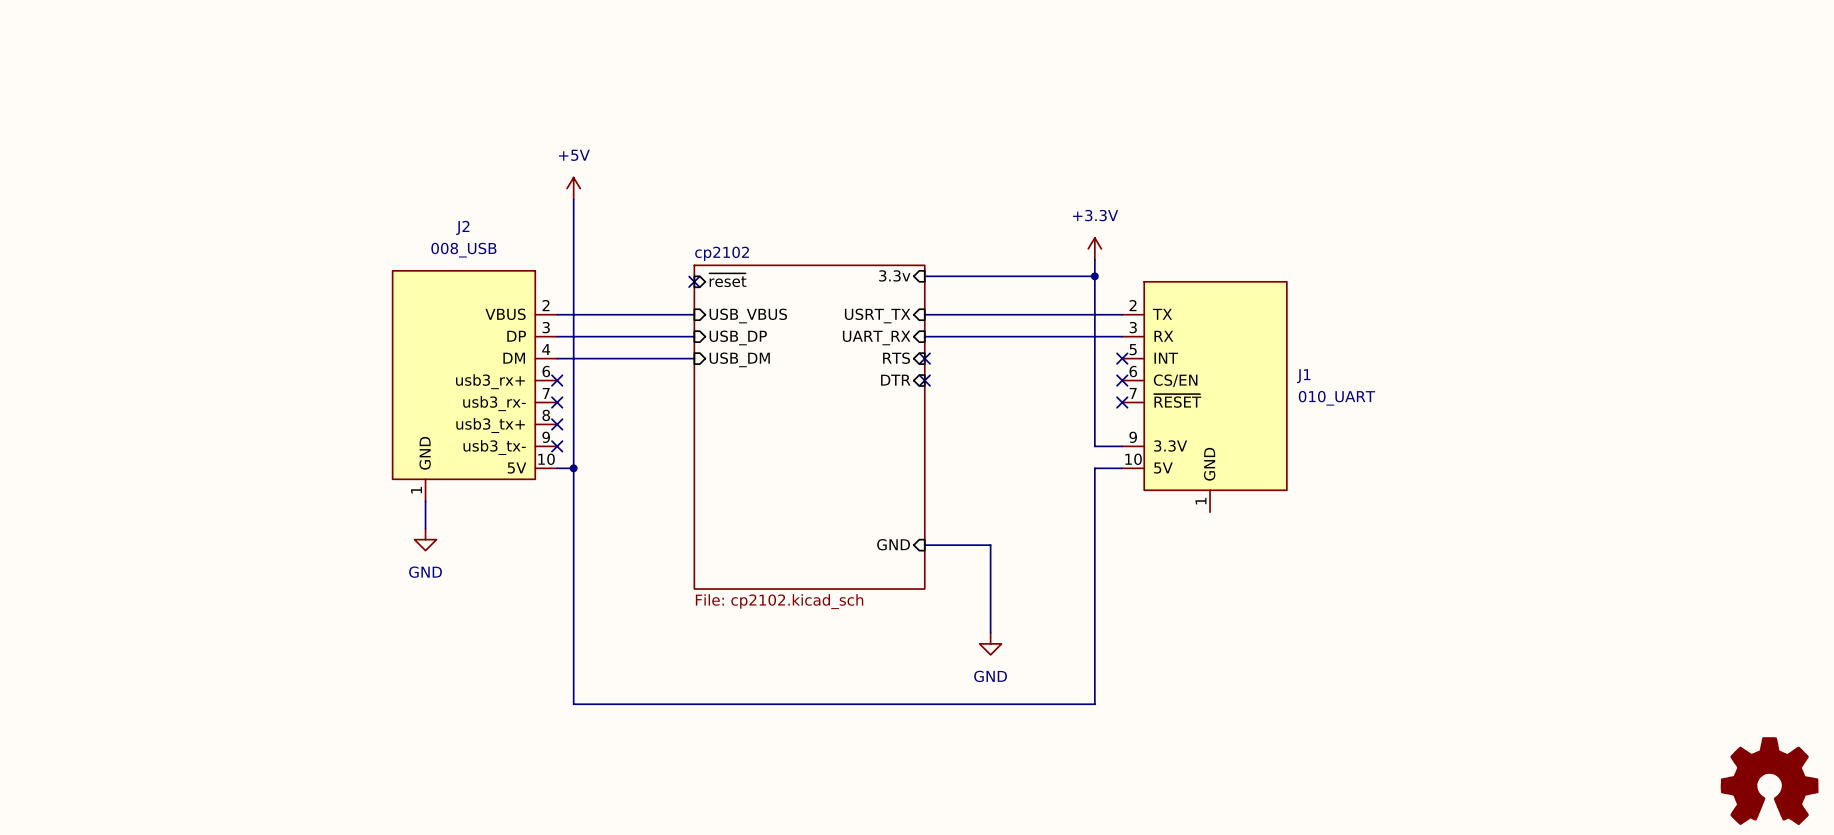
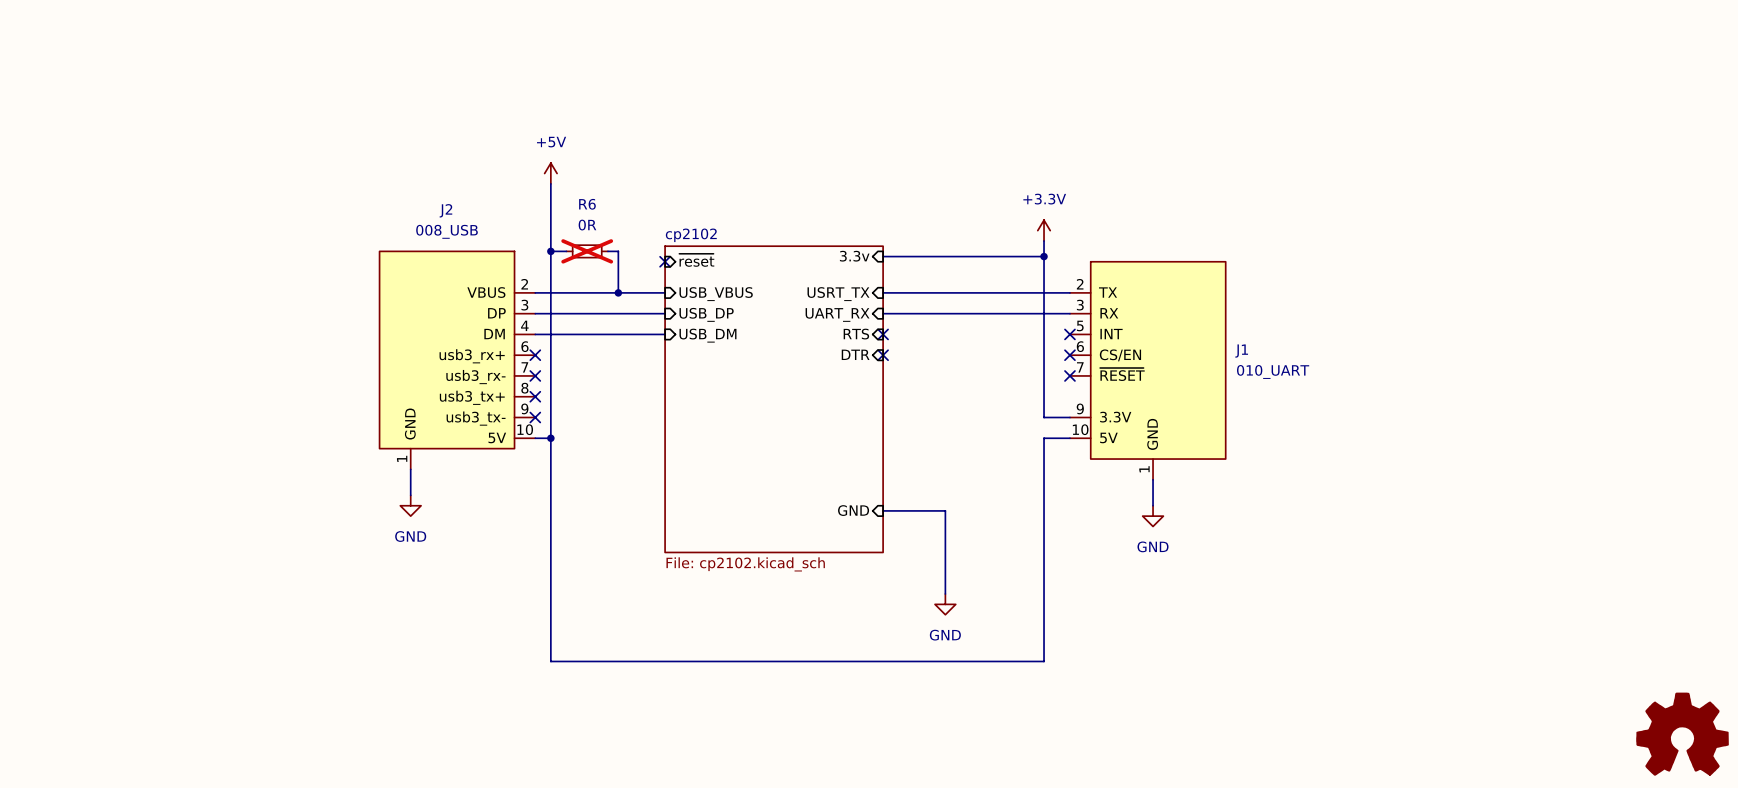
wire: none -> (550, 251) (566, 251)
junction: none -> (550, 251)
R6: none -> 0R (587, 251)
wire: none -> (607, 251) (618, 251) (618, 292)
junction: none -> (618, 292)
wire: none -> (1153, 479) (1153, 505)
power symbol: none -> GND (1153, 516)

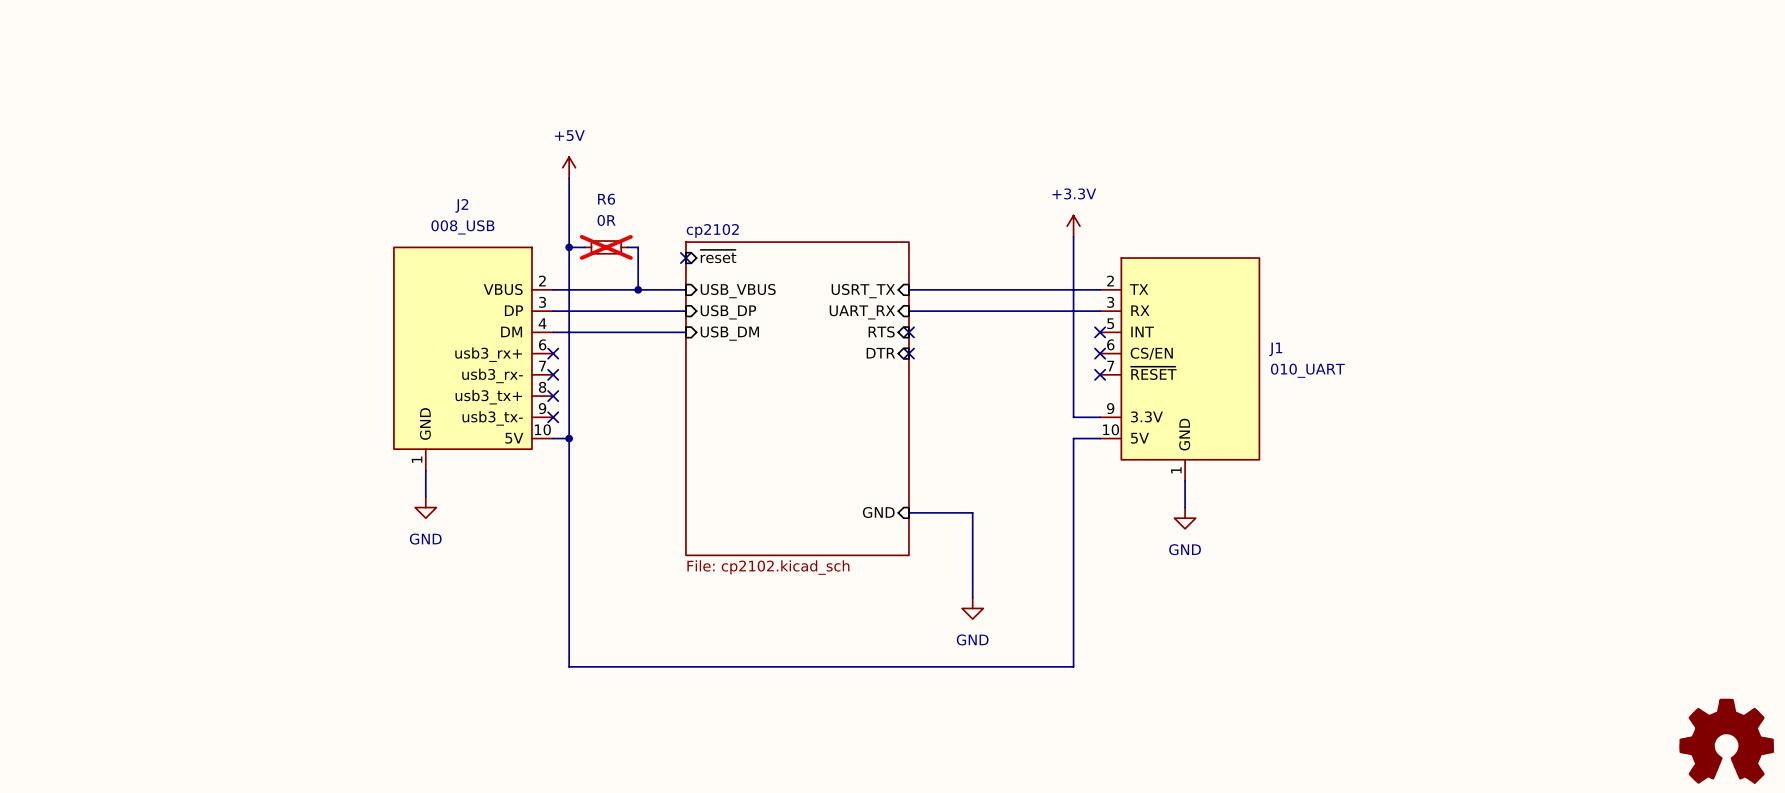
sheet pin: 3.3v (854, 256) -> none
wire: (883, 256) (1044, 256) -> none
junction: (1044, 256) -> none

